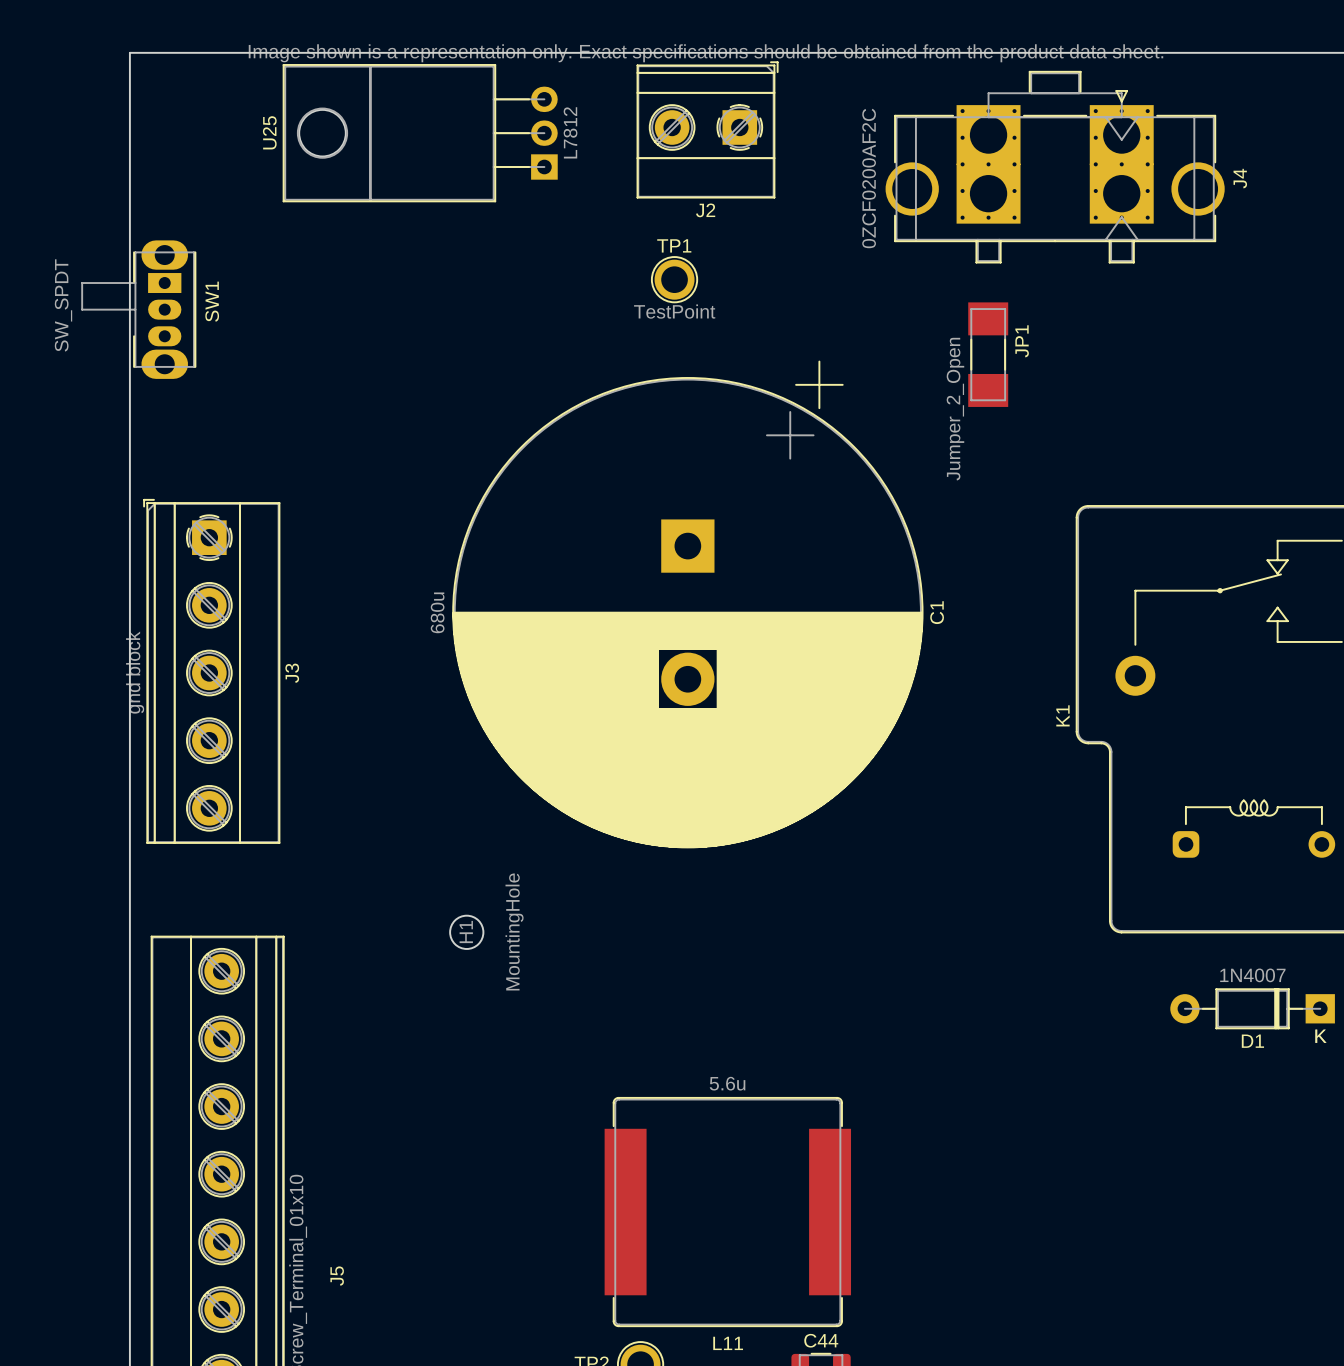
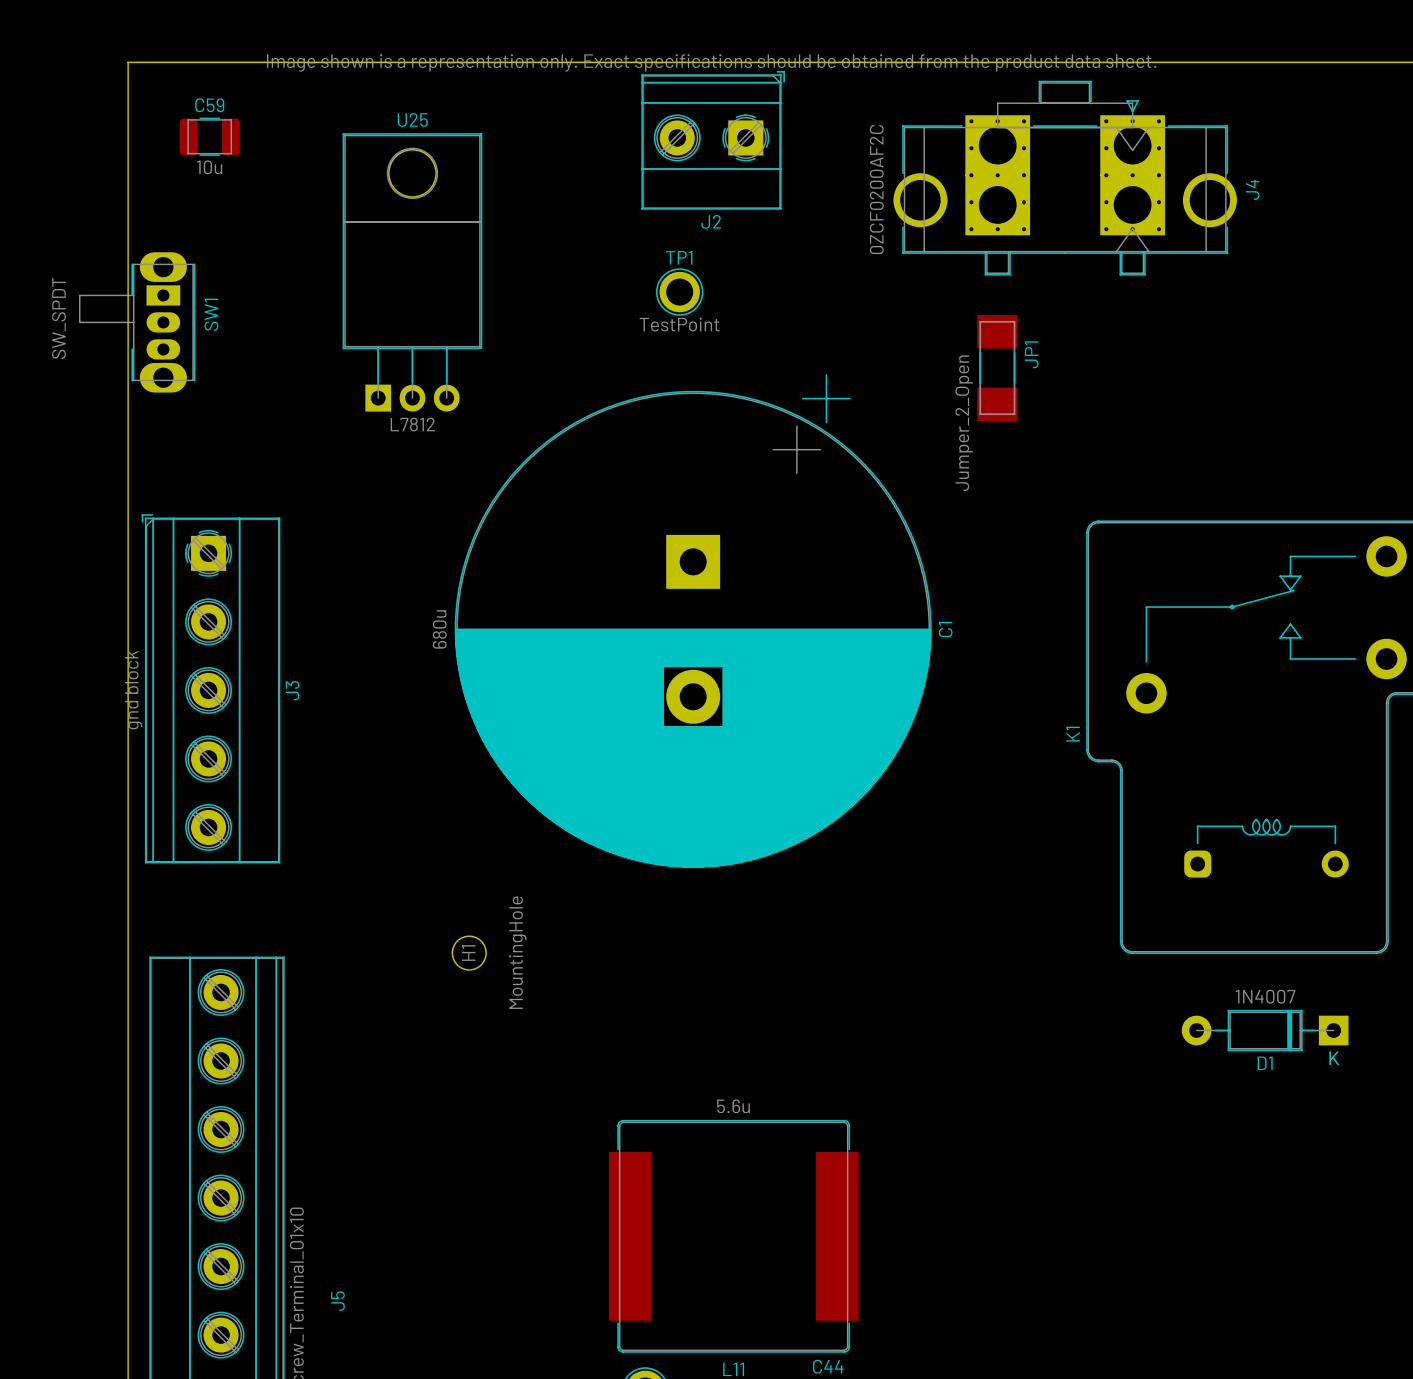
C59: none -> 10u (209, 136)
U25 rotation: 0° (420, 133) -> 90° clockwise (412, 272)

